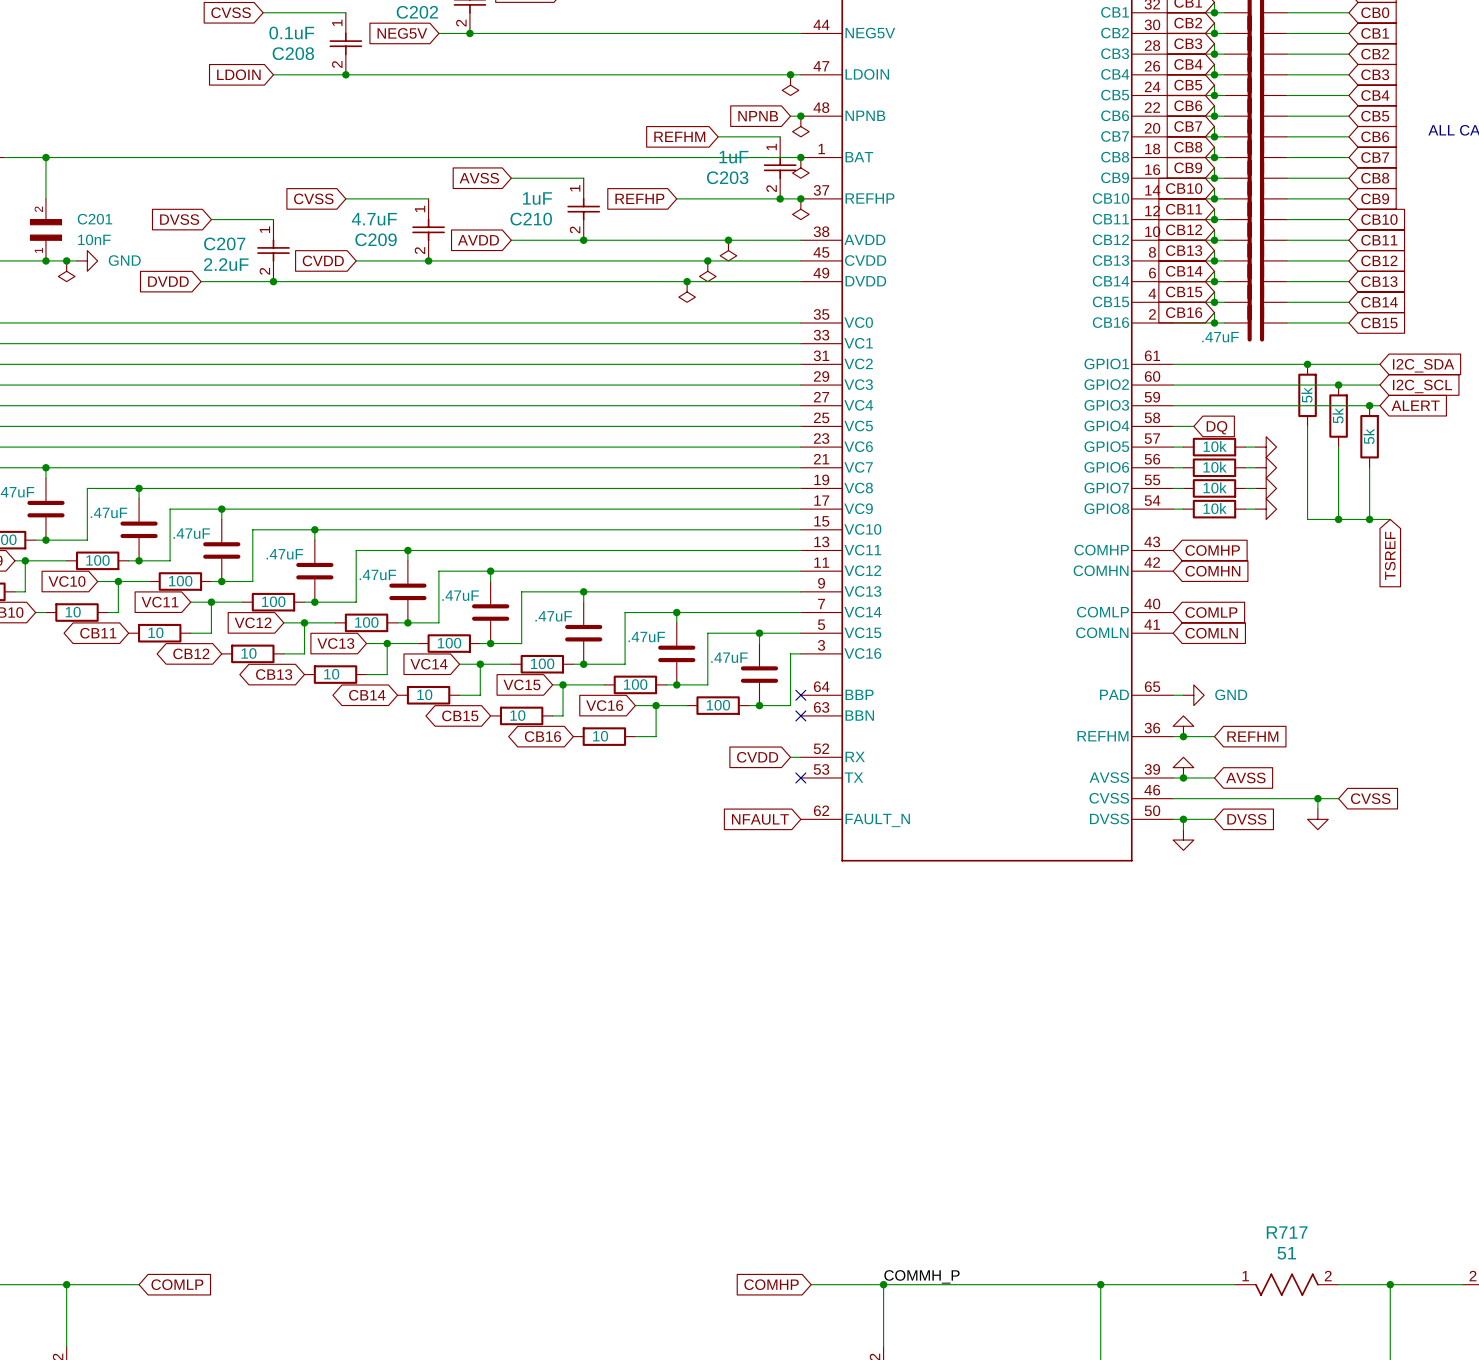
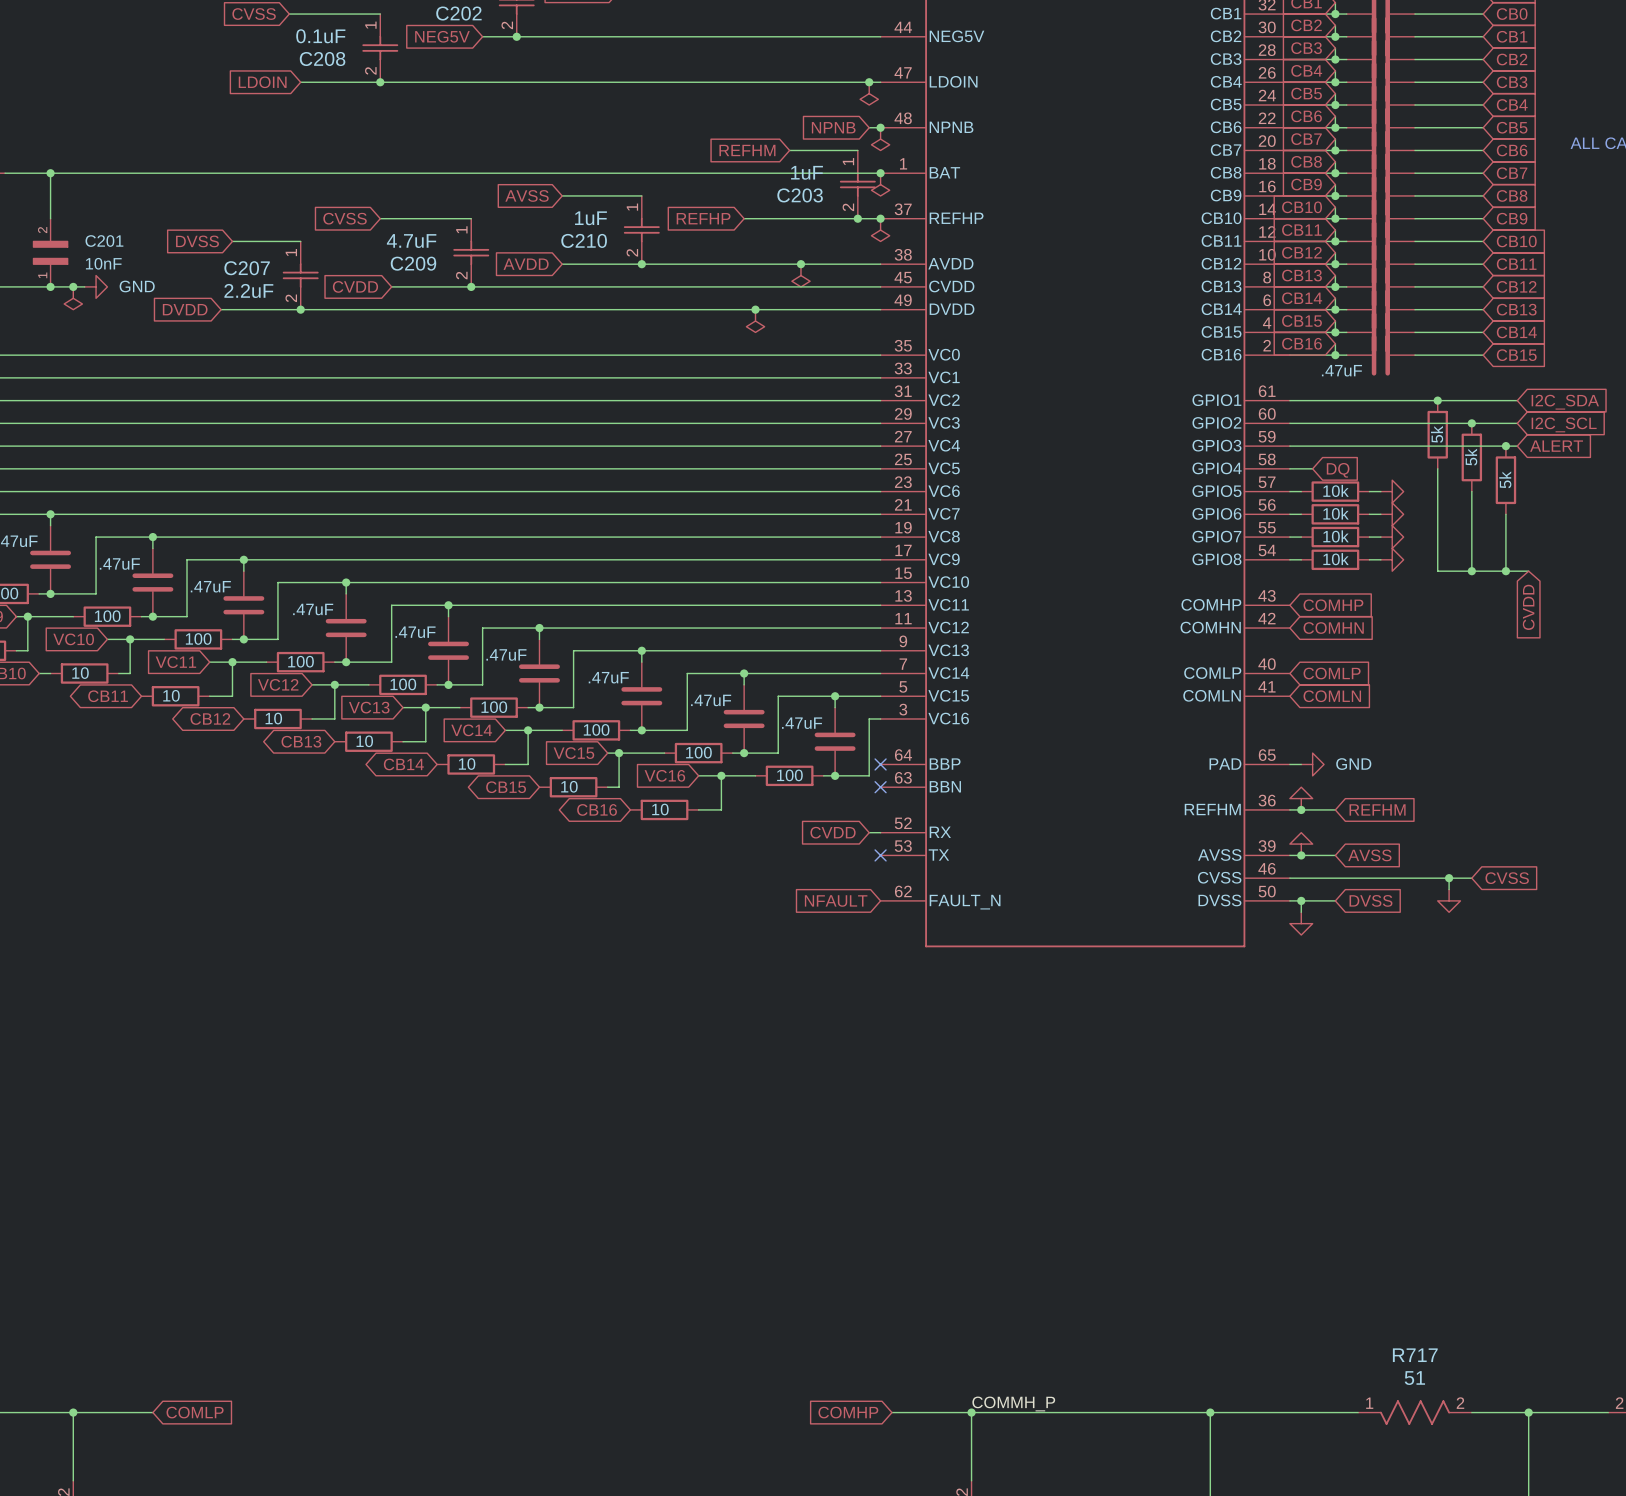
junction: (707, 260) -> none
power symbol: (707, 271) -> none
global label: TSREF (1390, 555) -> CVDD (1528, 607)

